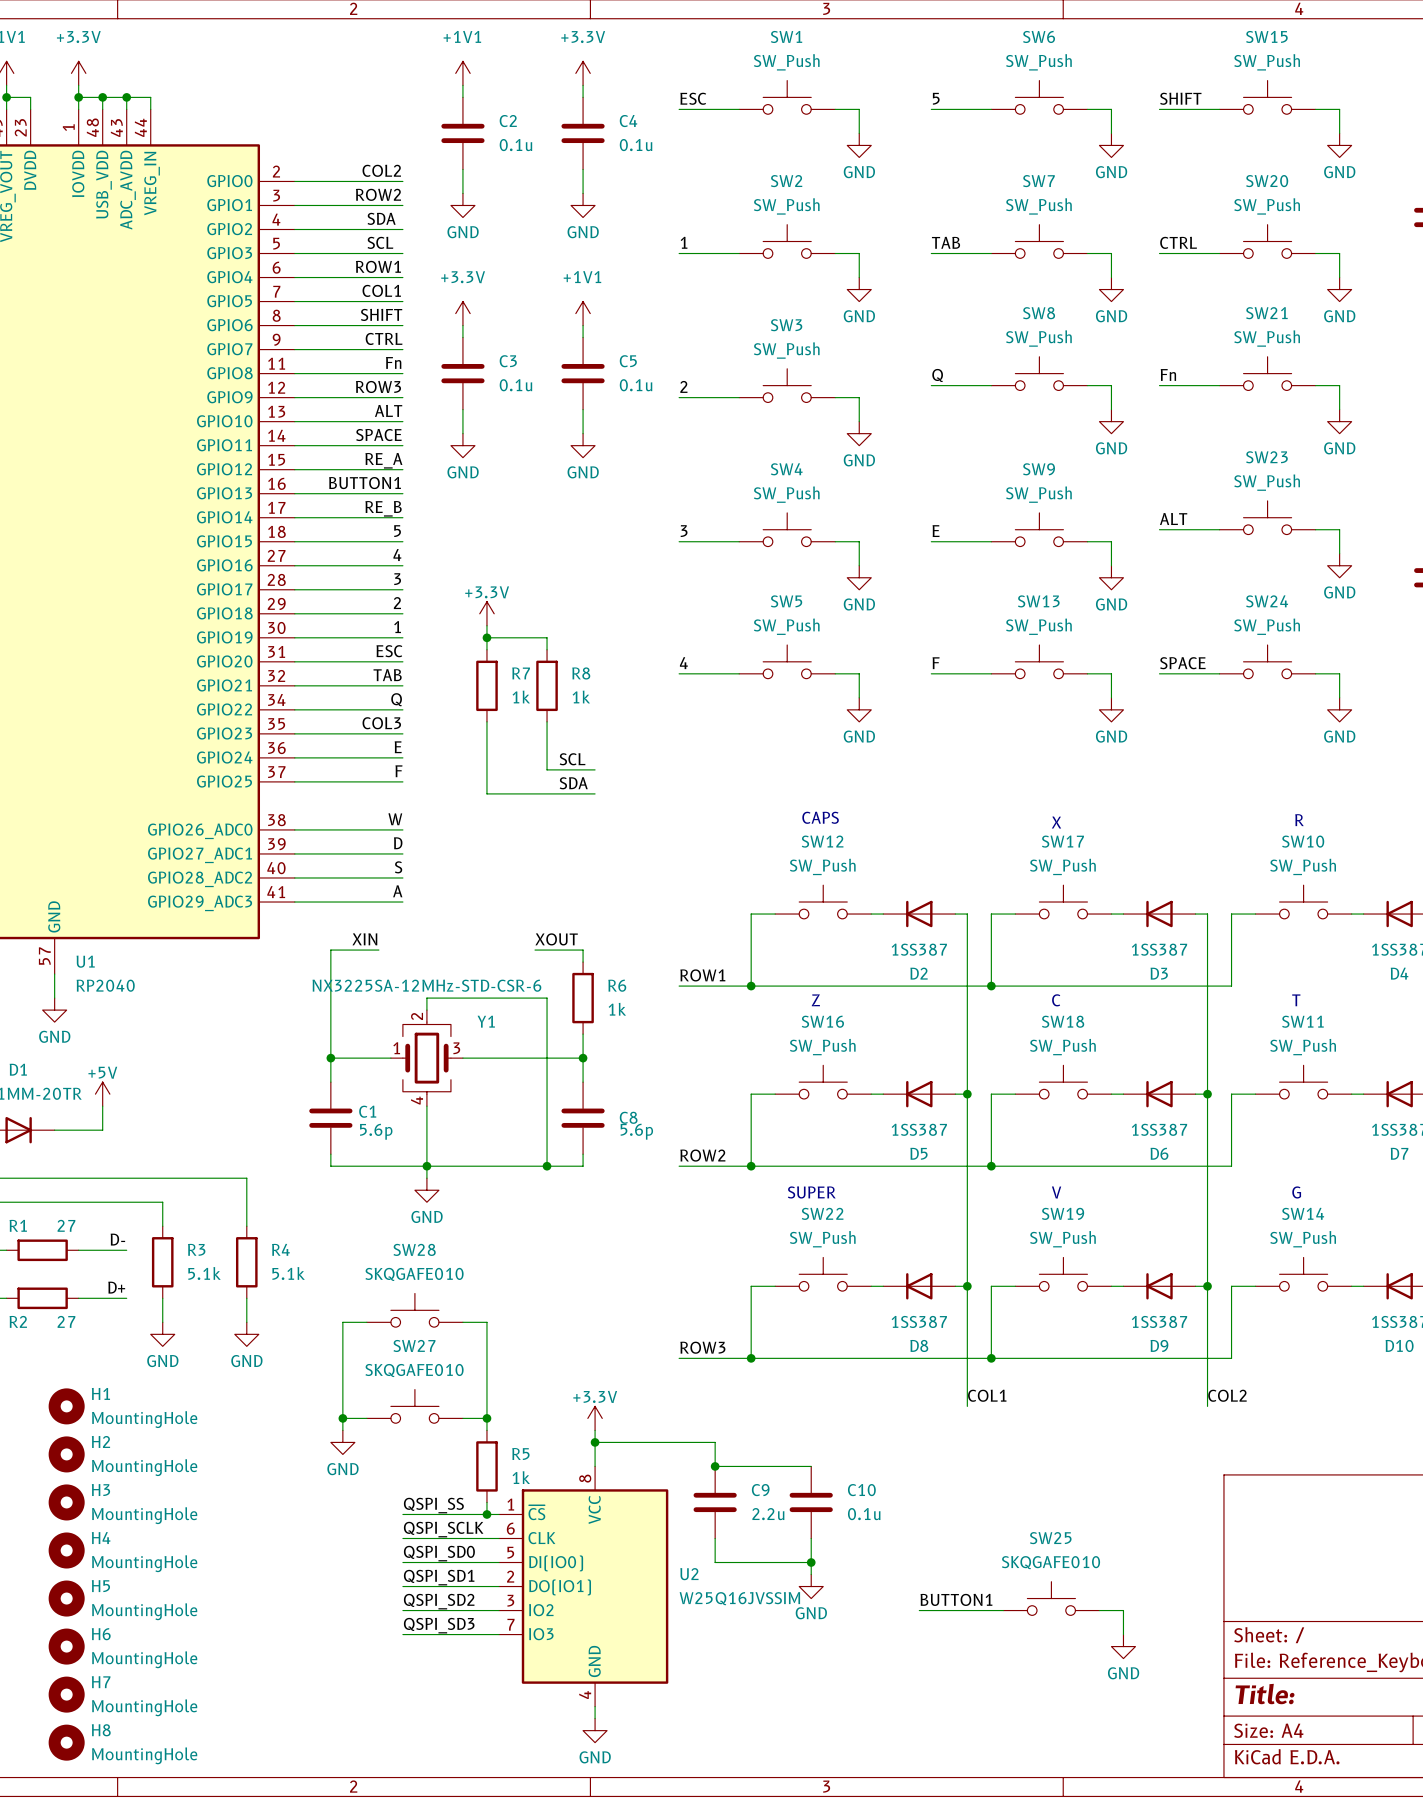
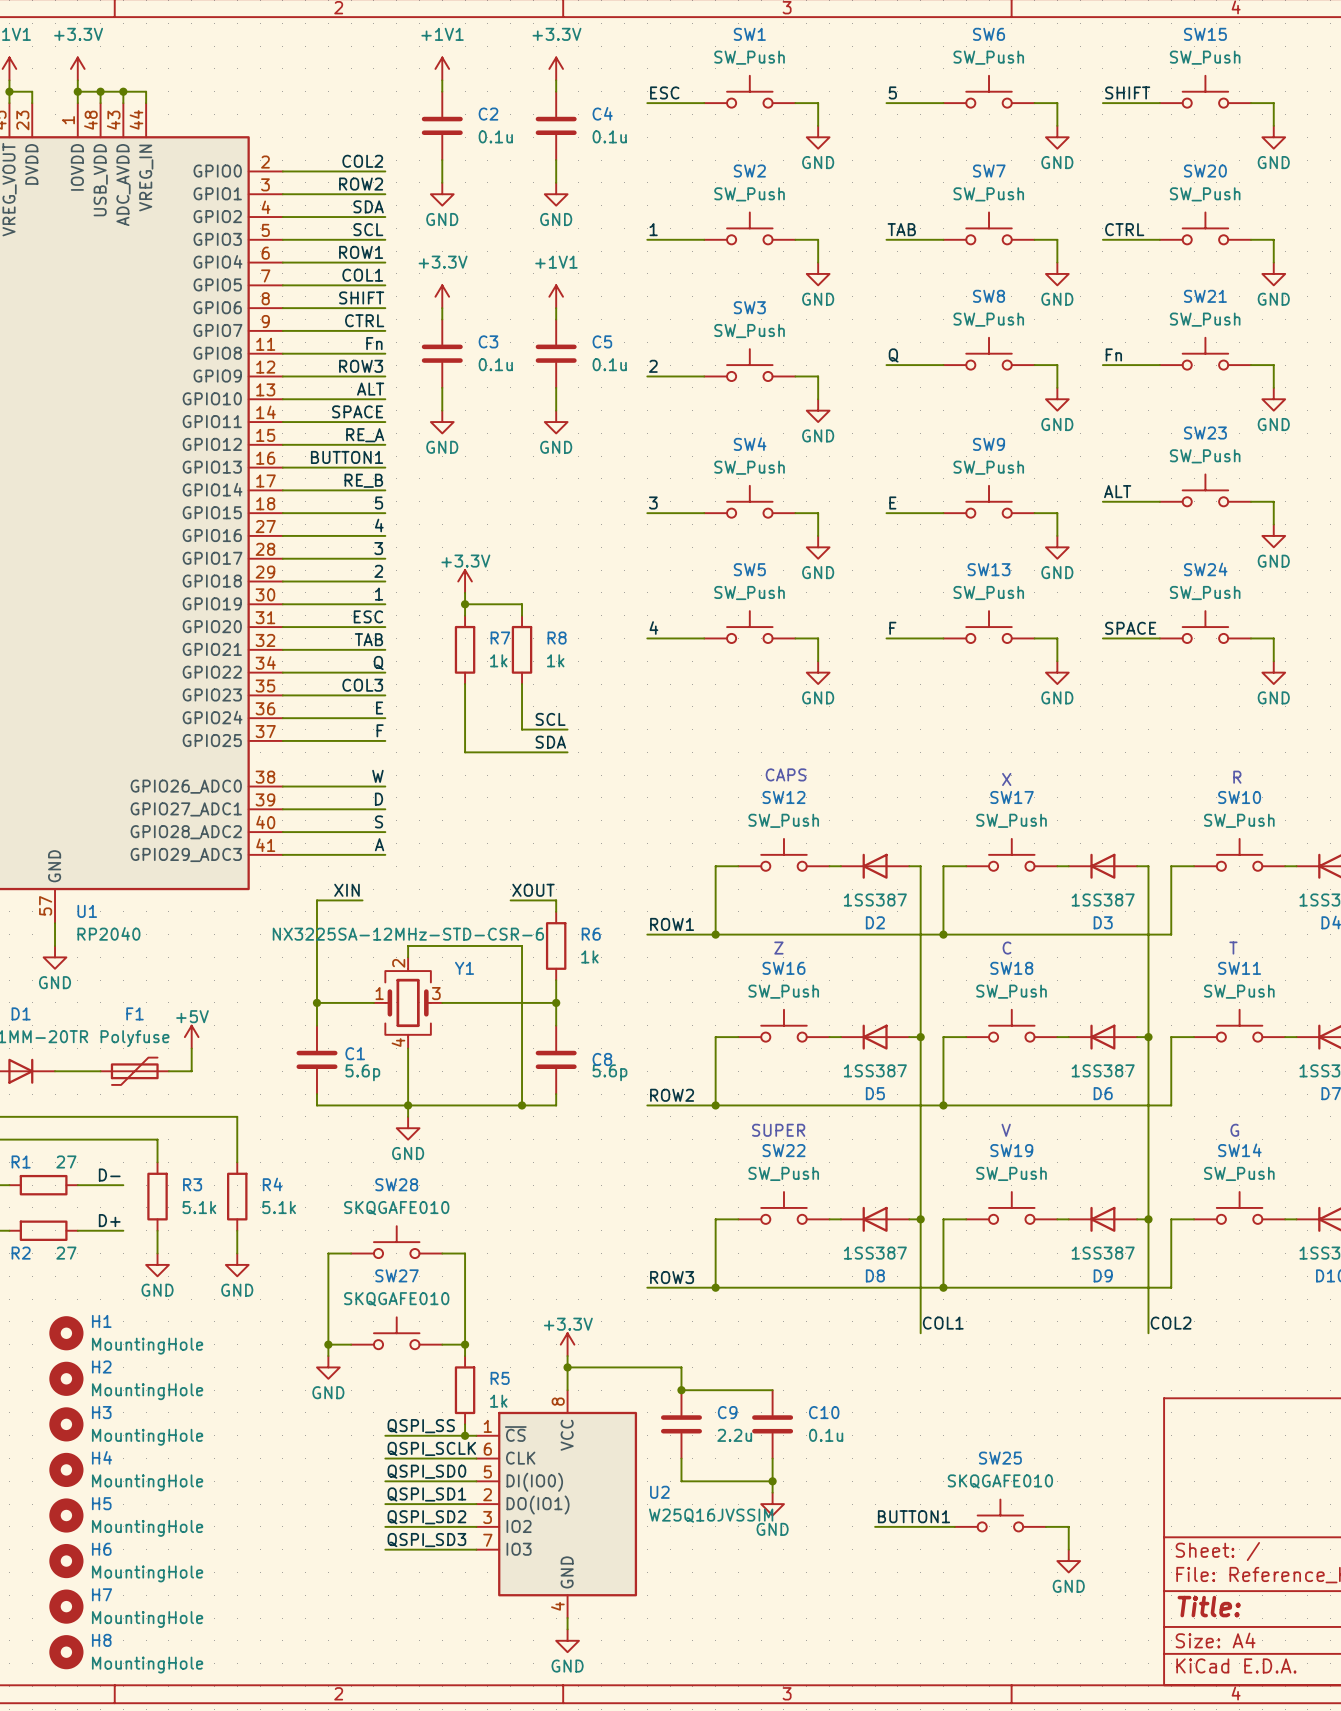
power symbol position: +5V (102, 1094) -> +5V (191, 1037)
wire: (102, 1106) (102, 1130) -> none
wire: none -> (191, 1048) (191, 1071) (168, 1071)
F1: none -> Polyfuse (134, 1071)

